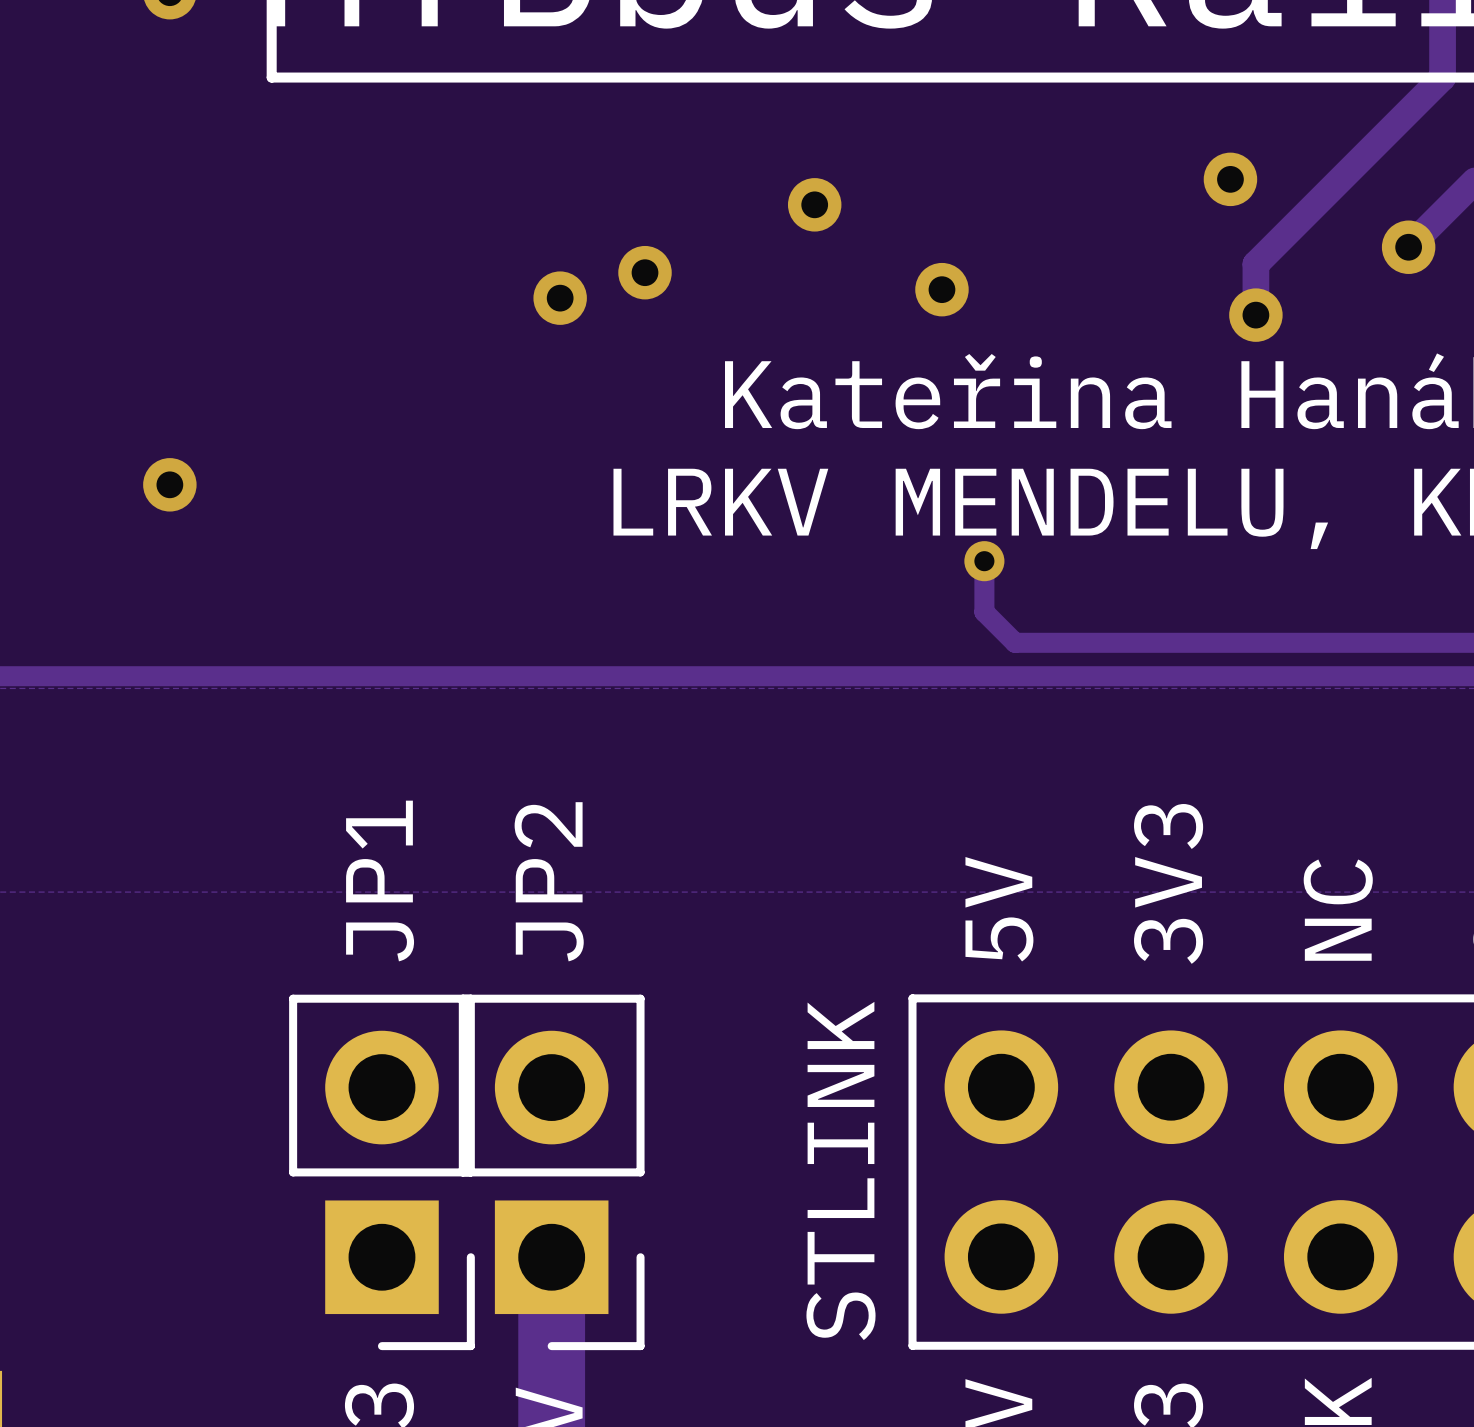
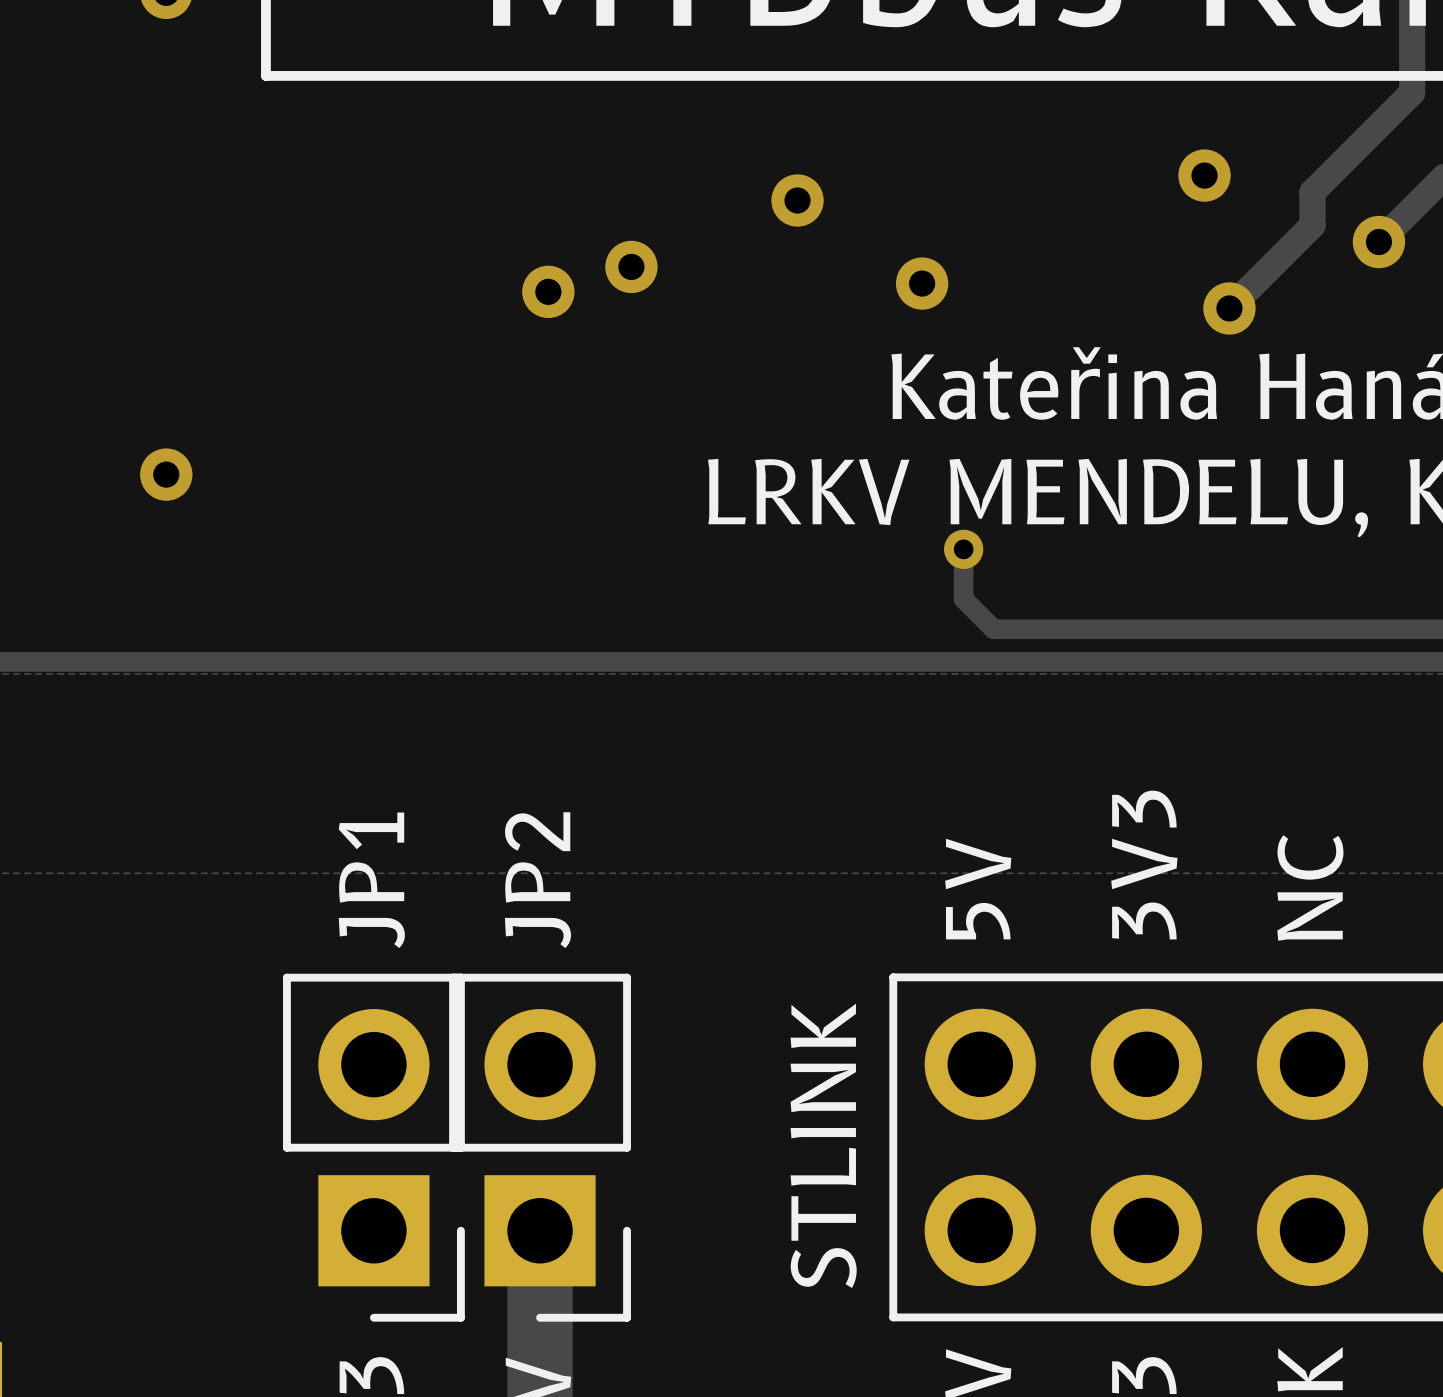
track: (1442, 77) (1255, 264) (1255, 315) -> (1412, 75) (1412, 92) (1312, 192) (1312, 225) (1229, 308)

